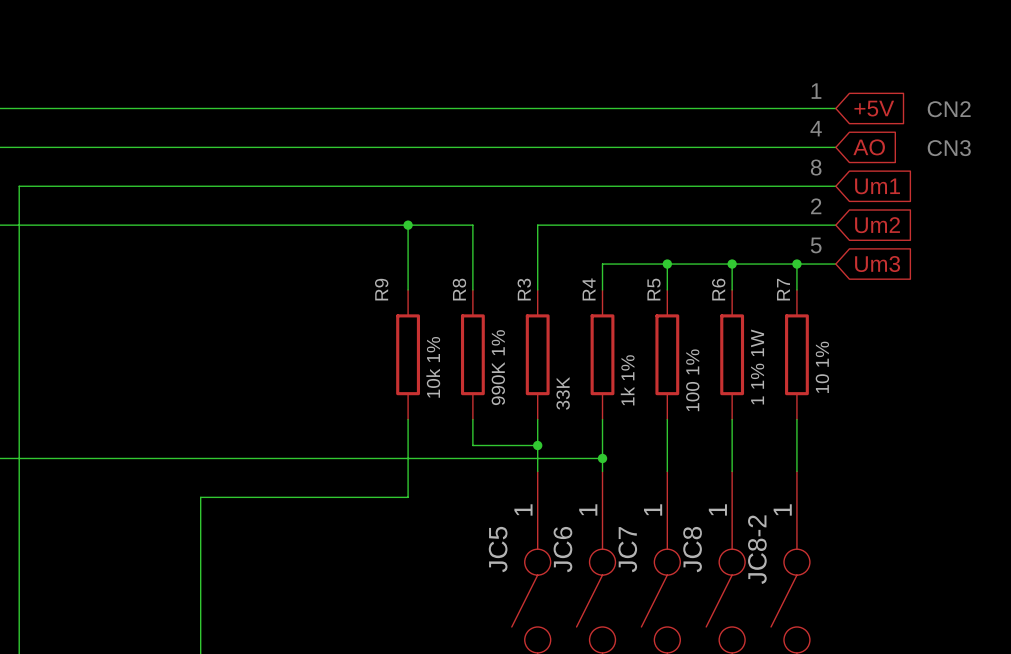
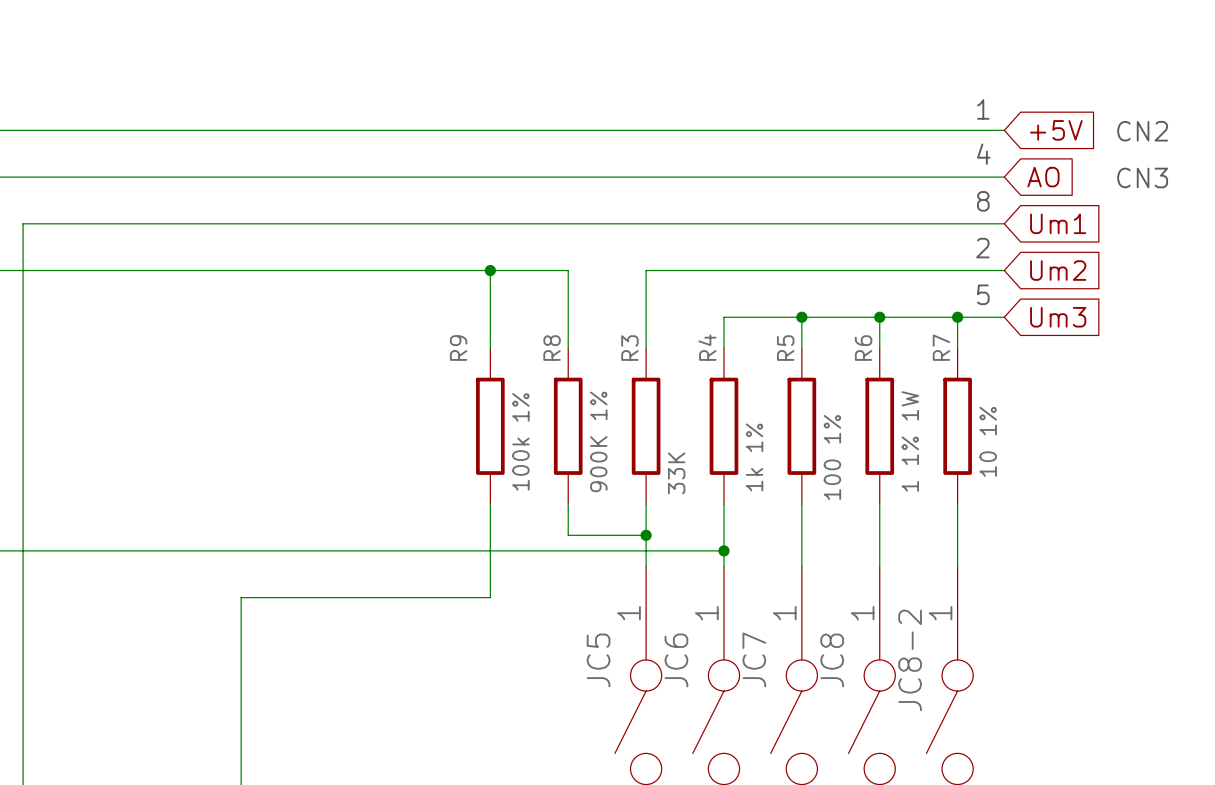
R9 value: 10k 1% (433, 367) -> 100k 1% (520, 441)
R8 value: 990K 1% (498, 367) -> 900K 1% (598, 441)

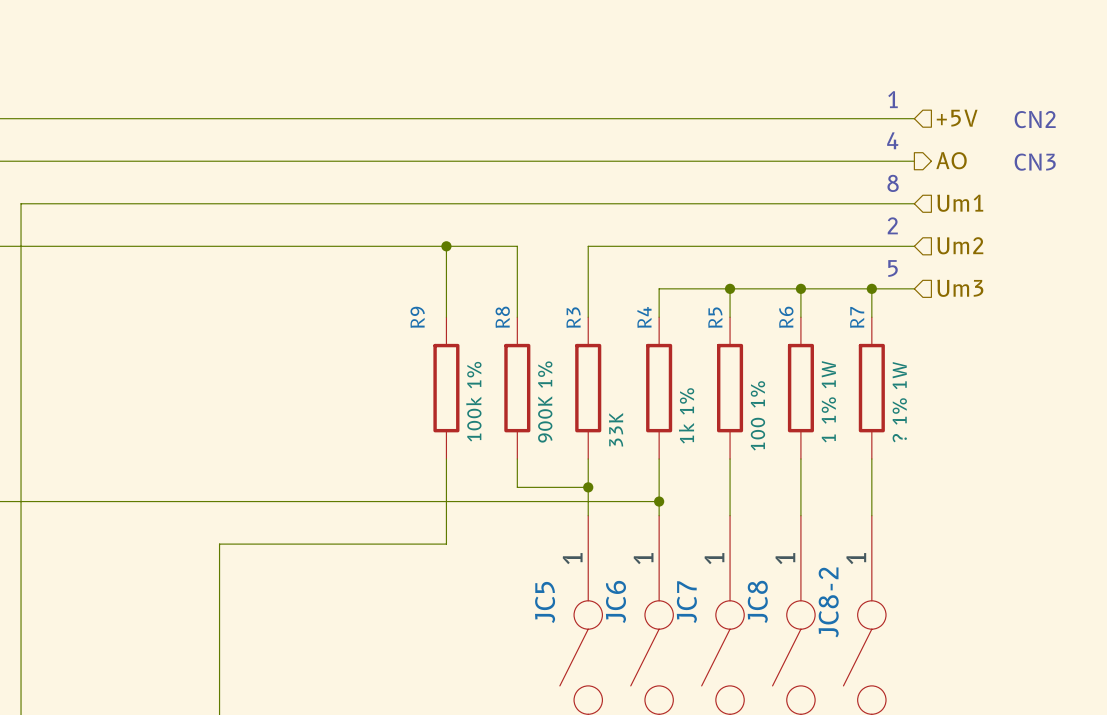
hierarchical label: none -> +5V (957, 118)
global label: +5V (1056, 130) -> none
hierarchical label: none -> AO (951, 160)
global label: AO (1043, 177) -> none
global label: Um1 (1058, 223) -> none
hierarchical label: none -> Um1 (960, 203)
hierarchical label: none -> Um2 (960, 245)
global label: Um2 (1058, 270) -> none
hierarchical label: none -> Um3 (960, 288)
global label: Um3 (1058, 317) -> none
R7 value: 10 1% (988, 441) -> ? 1% 1W (899, 402)

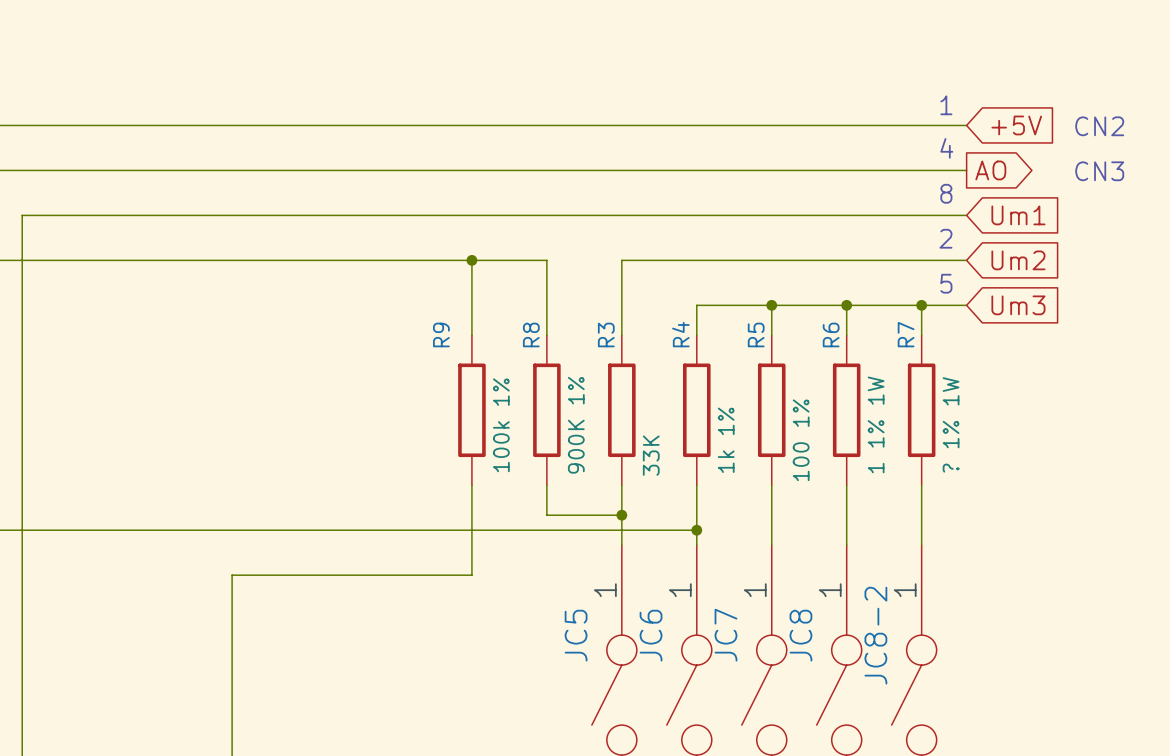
global label: none -> +5V (1016, 125)
hierarchical label: +5V (957, 118) -> none
hierarchical label: AO (951, 160) -> none
global label: none -> AO (990, 170)
global label: none -> Um1 (1018, 215)
hierarchical label: Um1 (960, 203) -> none
hierarchical label: Um2 (960, 245) -> none
global label: none -> Um2 (1018, 260)
global label: none -> Um3 (1018, 305)
hierarchical label: Um3 (960, 288) -> none

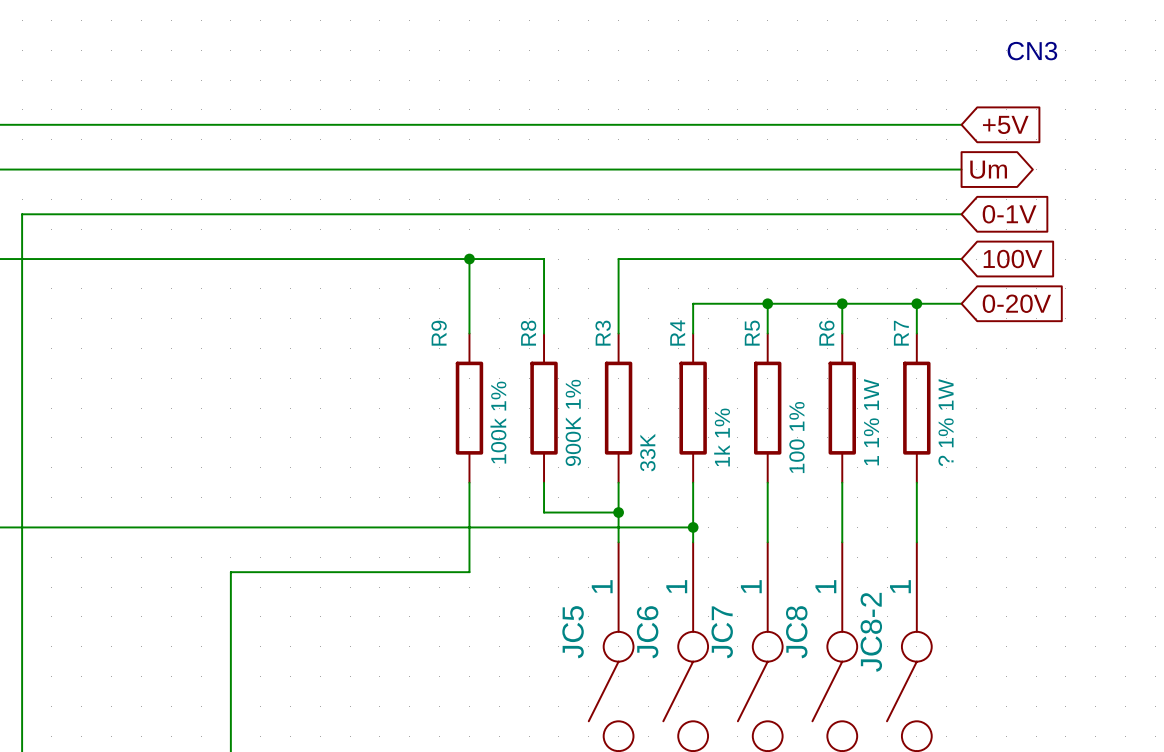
text: 1 (946, 105) -> none
text: CN2 (1099, 126) -> none
text: 4 (946, 148) -> none
global label: AO (990, 170) -> Um (988, 169)
text position: CN3 (1099, 171) -> CN3 (1032, 51)
text: 8 (946, 193) -> none
global label: Um1 (1018, 215) -> 0-1V (1009, 214)
text: 2 (945, 238) -> none
global label: Um2 (1018, 260) -> 100V (1013, 259)
text: 5 (946, 283) -> none
global label: Um3 (1018, 305) -> 0-20V (1016, 303)

